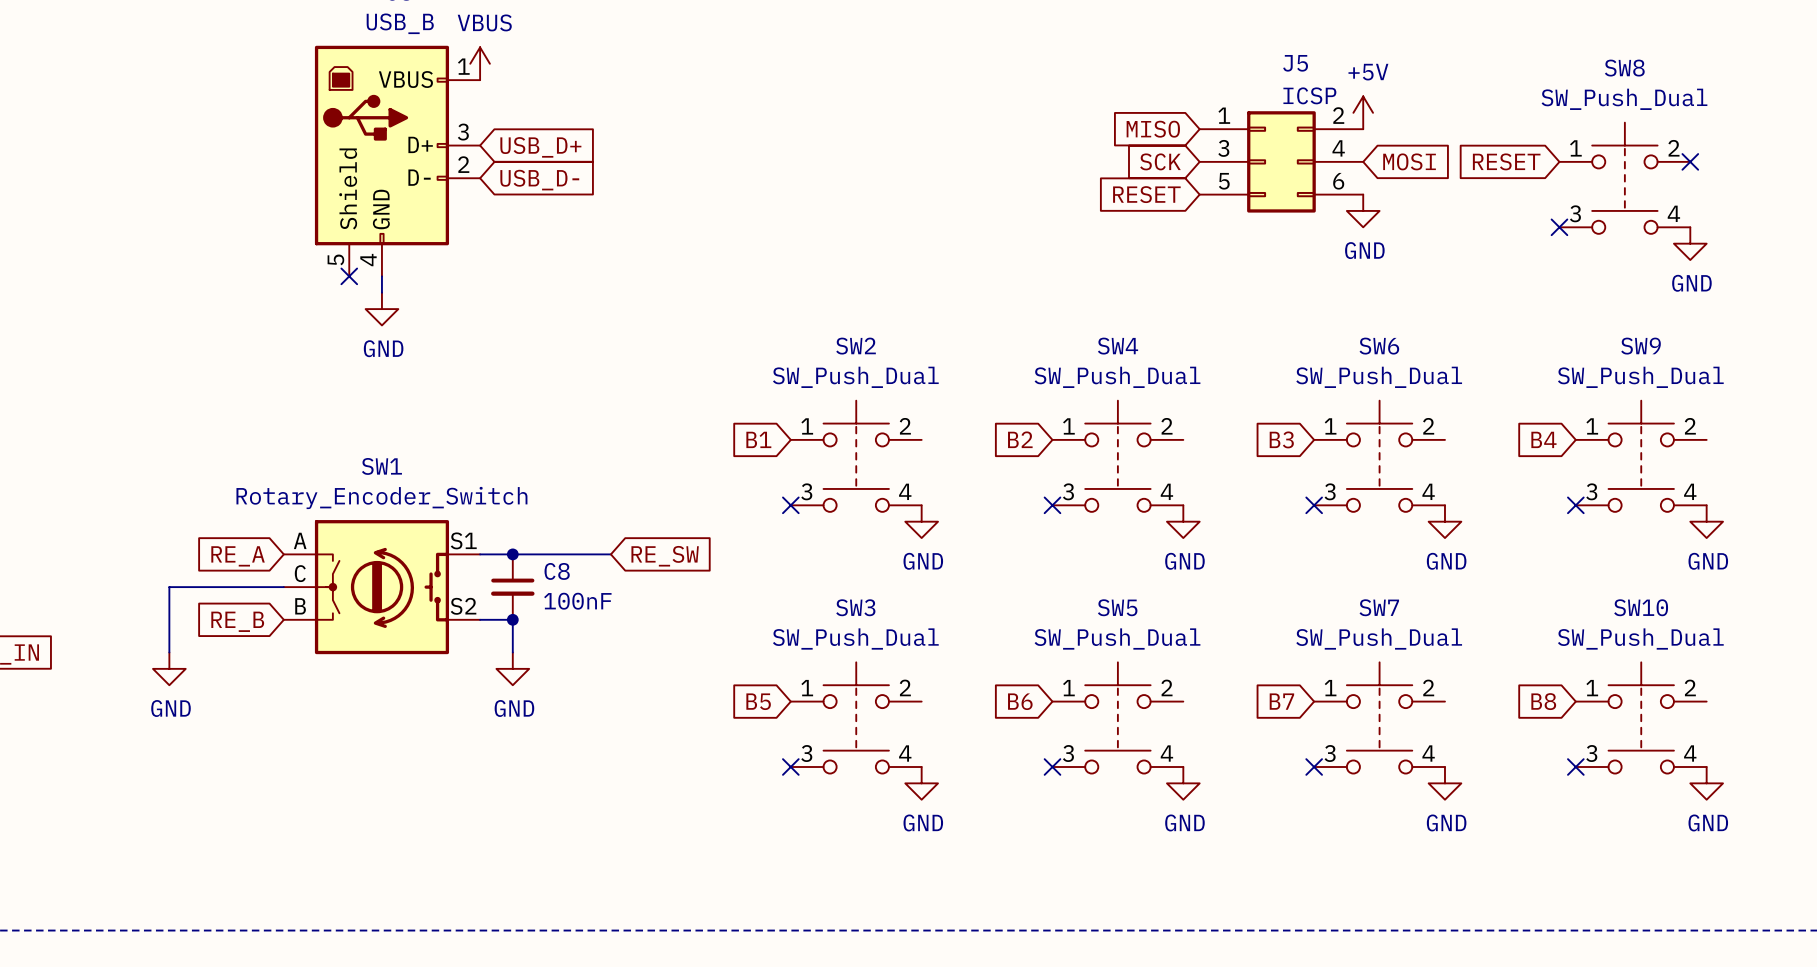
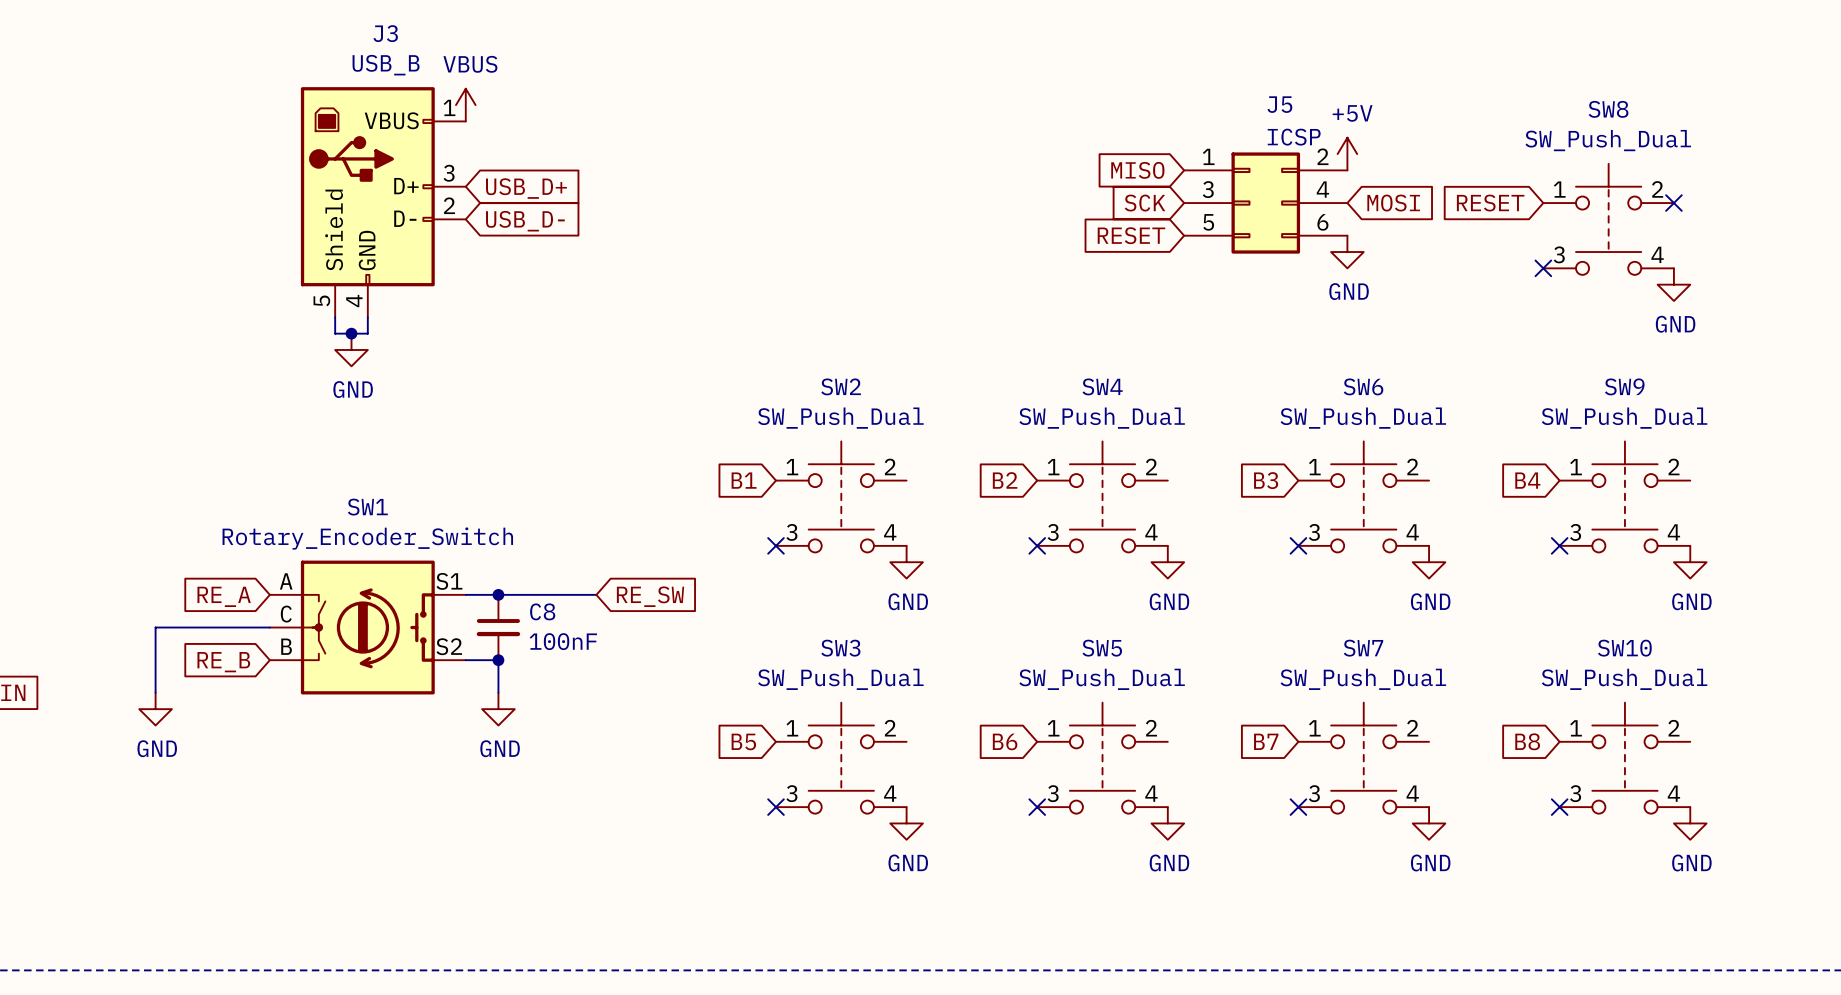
wire: none -> (335, 317) (335, 333) (367, 333)
no-connect mark: (349, 276) -> none
junction: none -> (351, 333)
power symbol position: GND (381, 309) -> GND (351, 349)

